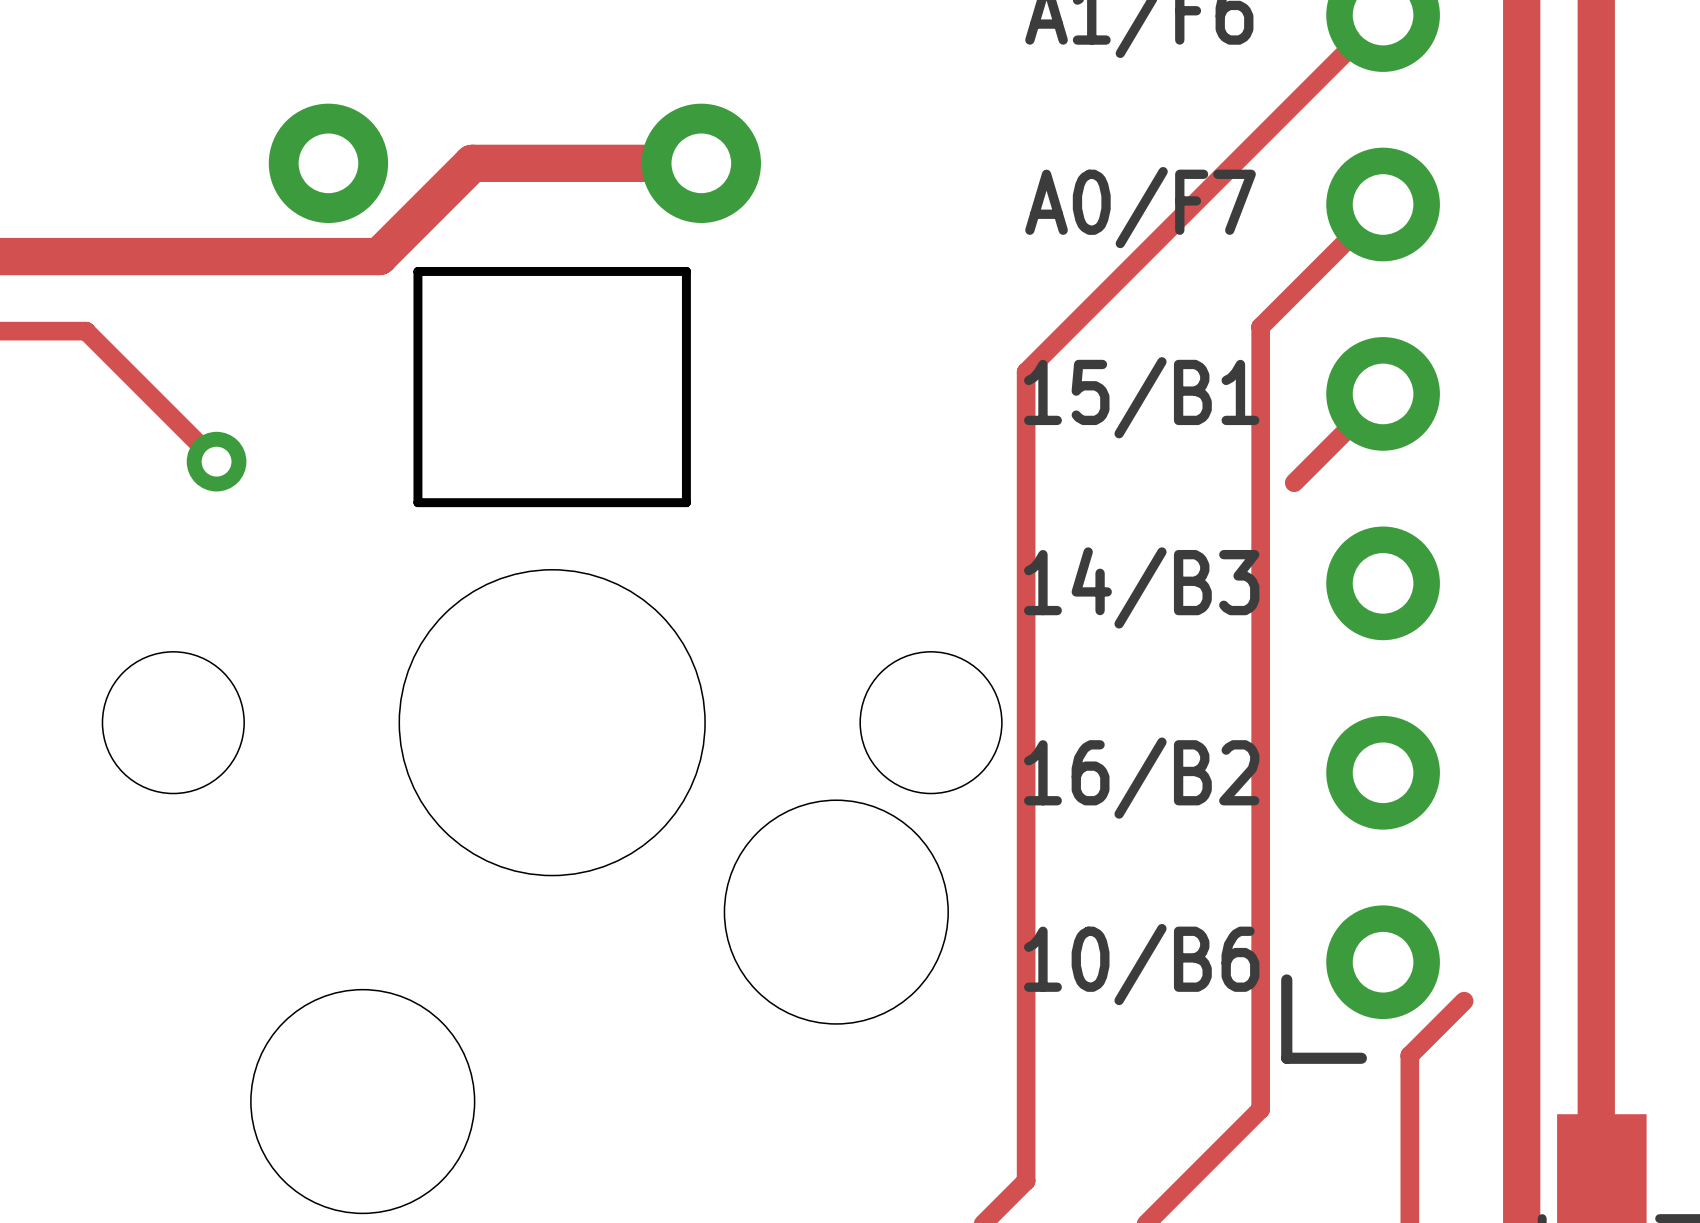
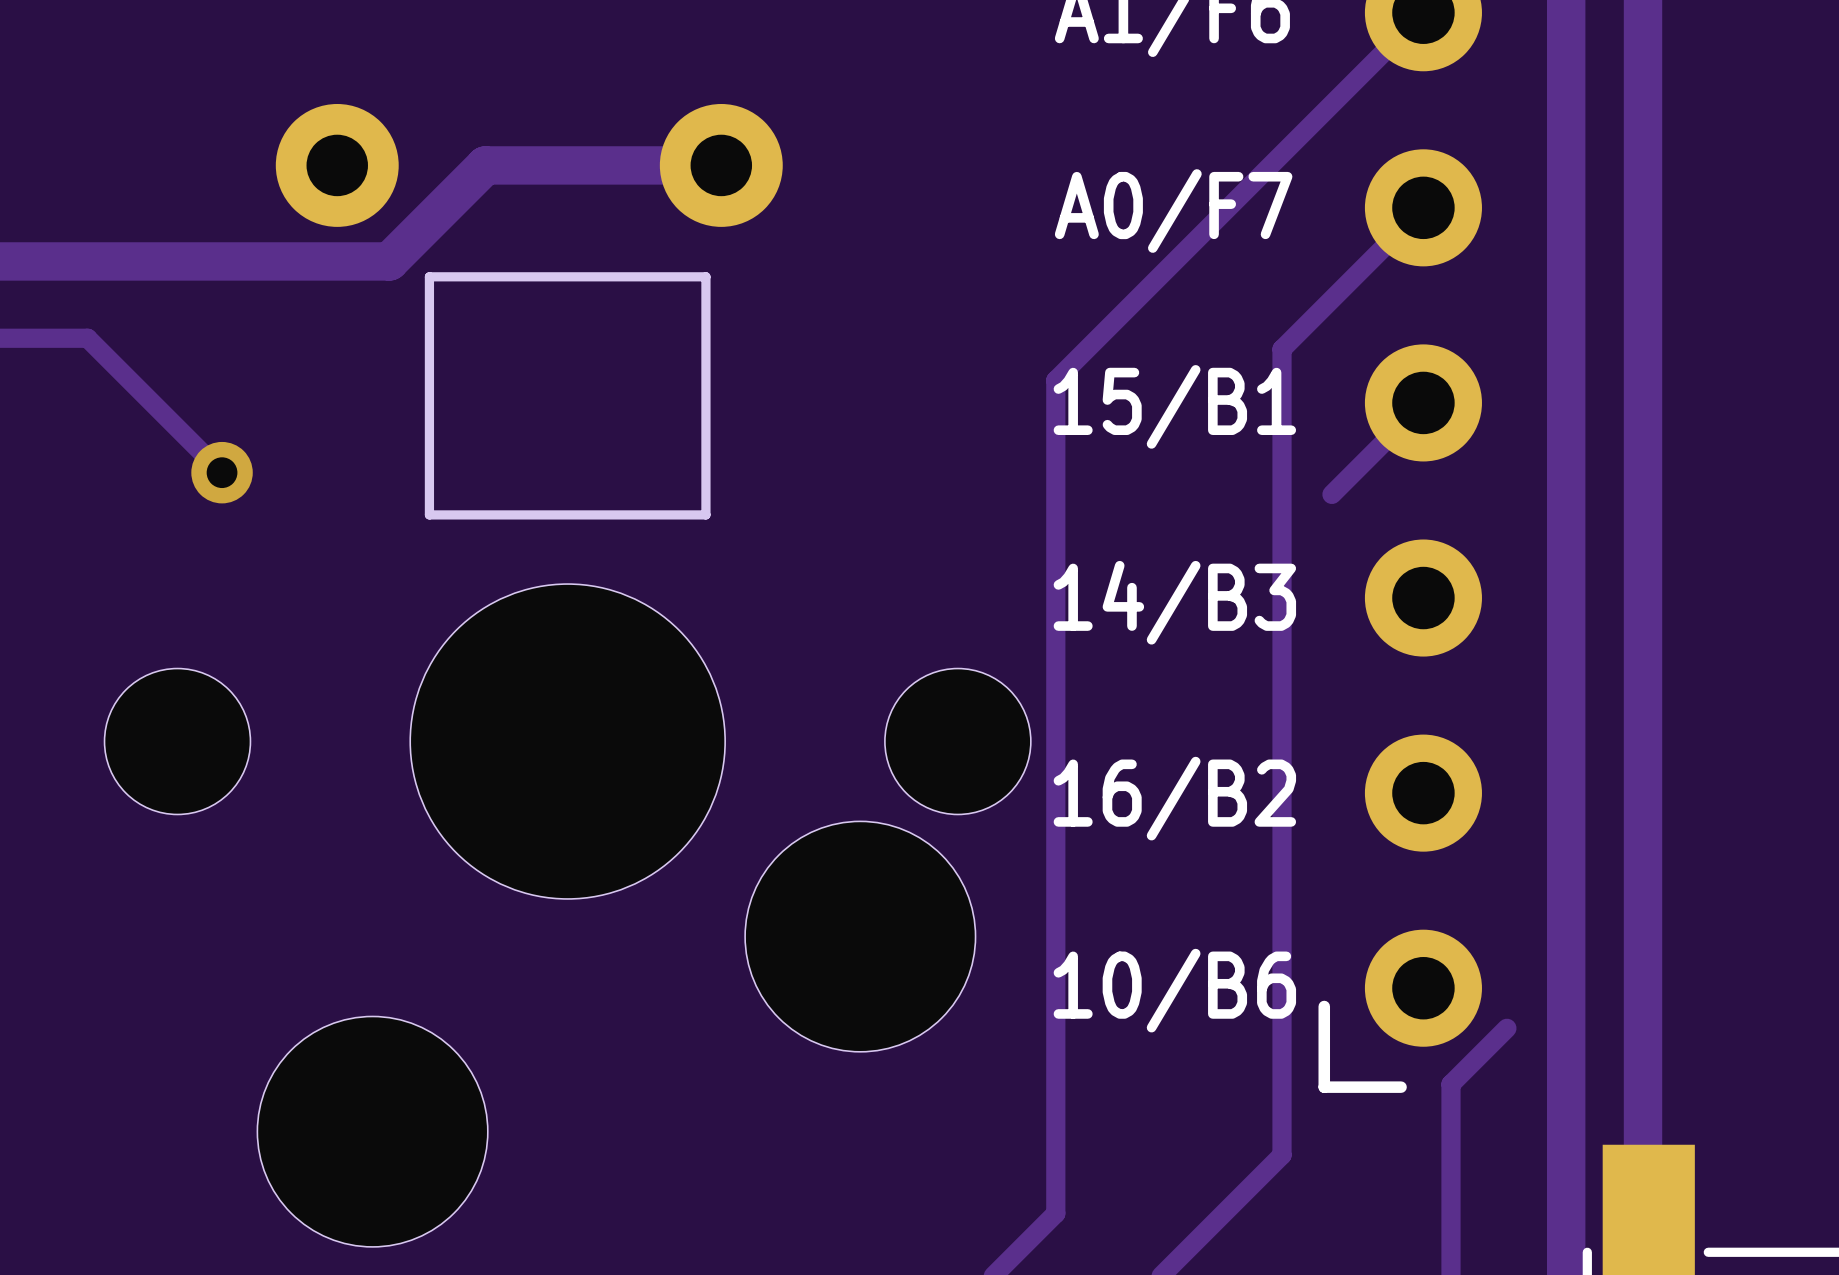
track: (1260, 326) (1260, 1109) (1245, 1124) -> (1297, 333) (1282, 349) (1282, 1155)

